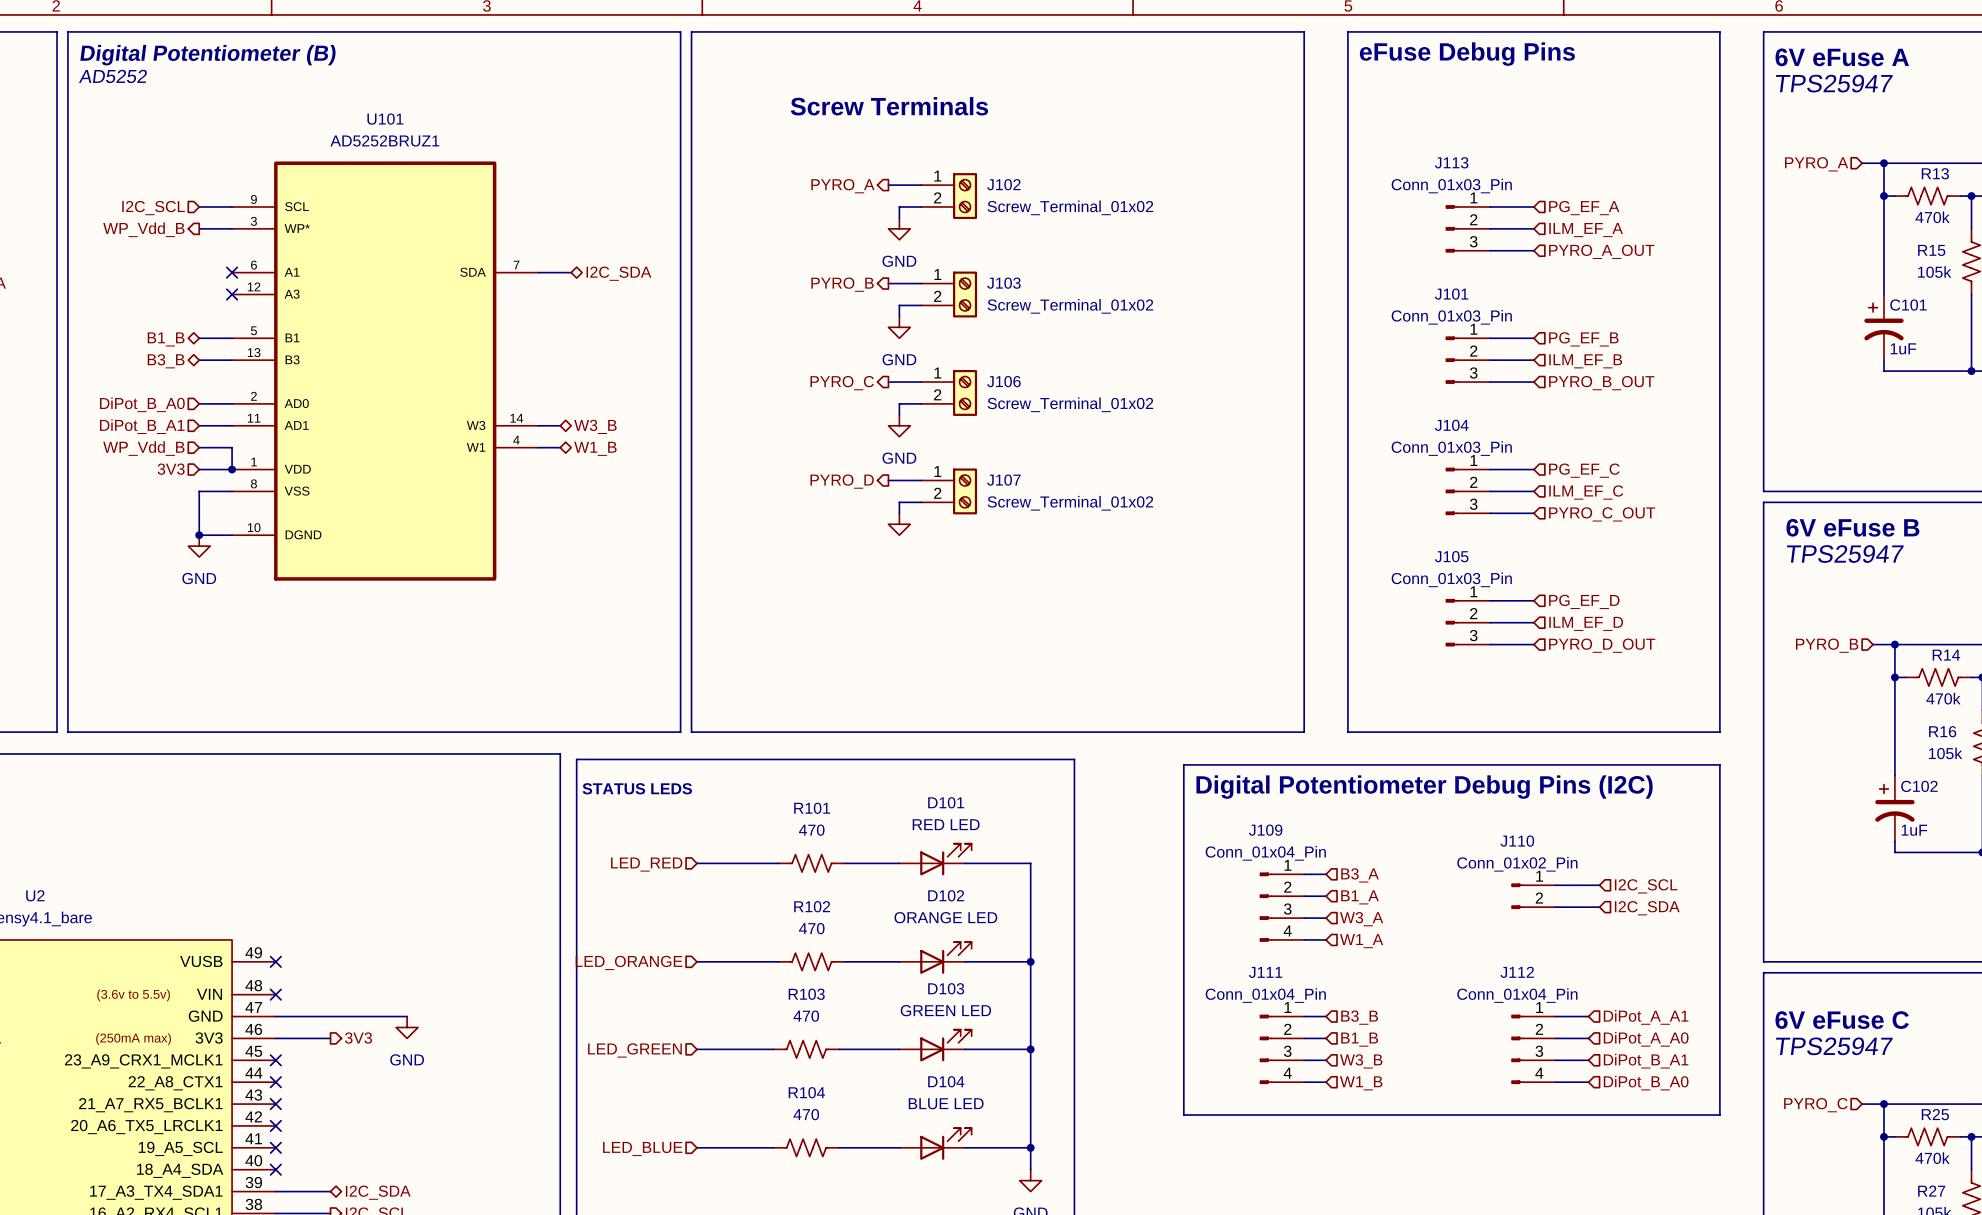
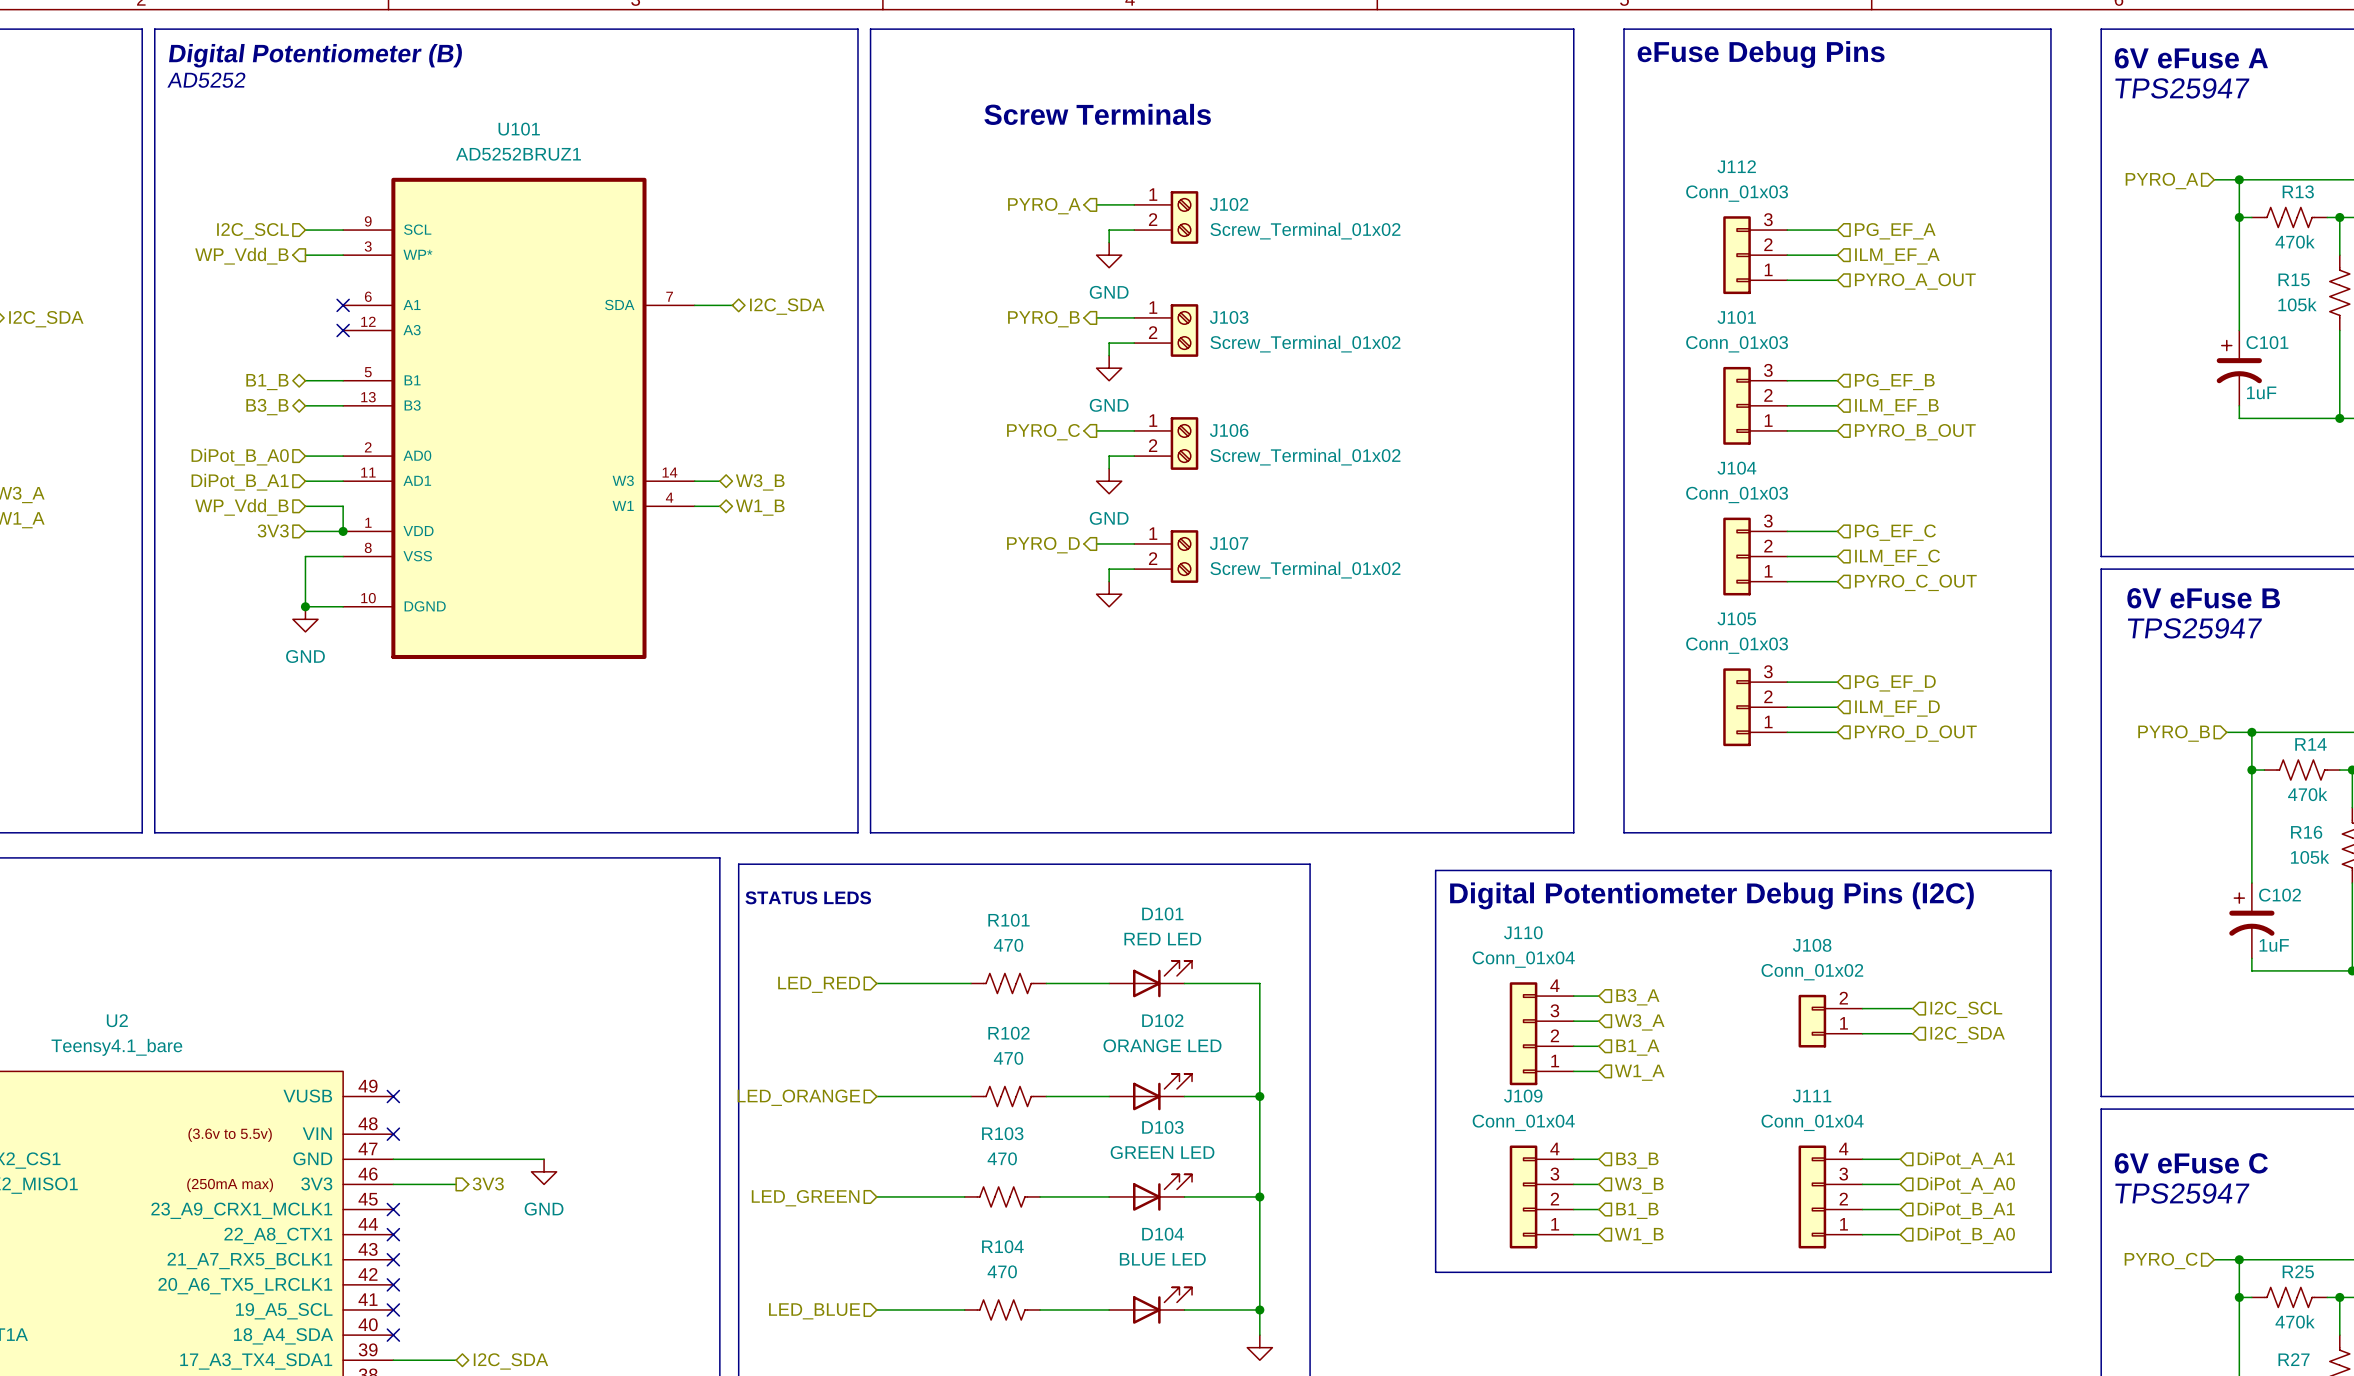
J113: Conn_01x03_Pin (1467, 228) -> none
J101 value: Conn_01x03_Pin (1451, 317) -> Conn_01x03 (1737, 344)
J101 symbol: [1445, 336, 1491, 384] -> [1723, 366, 1788, 445]
J104 value: Conn_01x03_Pin (1451, 448) -> Conn_01x03 (1737, 495)
J104 symbol: [1445, 467, 1491, 516] -> [1723, 517, 1788, 596]
J105 value: Conn_01x03_Pin (1451, 579) -> Conn_01x03 (1737, 645)
J105 symbol: [1445, 599, 1491, 647] -> [1723, 668, 1788, 747]
J110 name position: J110 (1517, 841) -> J110 (1523, 932)
J109 value: Conn_01x04_Pin (1265, 853) -> Conn_01x04 (1523, 1122)
J110 value: Conn_01x02_Pin (1517, 864) -> Conn_01x04 (1523, 959)
J109 symbol: [1259, 872, 1305, 942] -> [1509, 1145, 1574, 1249]
J110 symbol: [1511, 883, 1556, 909] -> [1509, 982, 1574, 1086]
J108: none -> Conn_01x02 (1830, 1021)
hierarchical label: B1_A (1360, 897) -> W3_A (1639, 1022)
hierarchical label: W3_A (1361, 919) -> B1_A (1637, 1047)
J111 value: Conn_01x04_Pin (1265, 995) -> Conn_01x04 (1812, 1122)
J112 value: Conn_01x04_Pin (1517, 995) -> Conn_01x03 (1737, 193)
J111 symbol: [1259, 1014, 1305, 1084] -> [1798, 1145, 1863, 1249]
J112 symbol: [1511, 1014, 1556, 1084] -> [1723, 216, 1788, 295]
hierarchical label: B1_B (1359, 1039) -> W3_B (1639, 1185)
hierarchical label: W3_B (1361, 1061) -> B1_B (1637, 1210)

